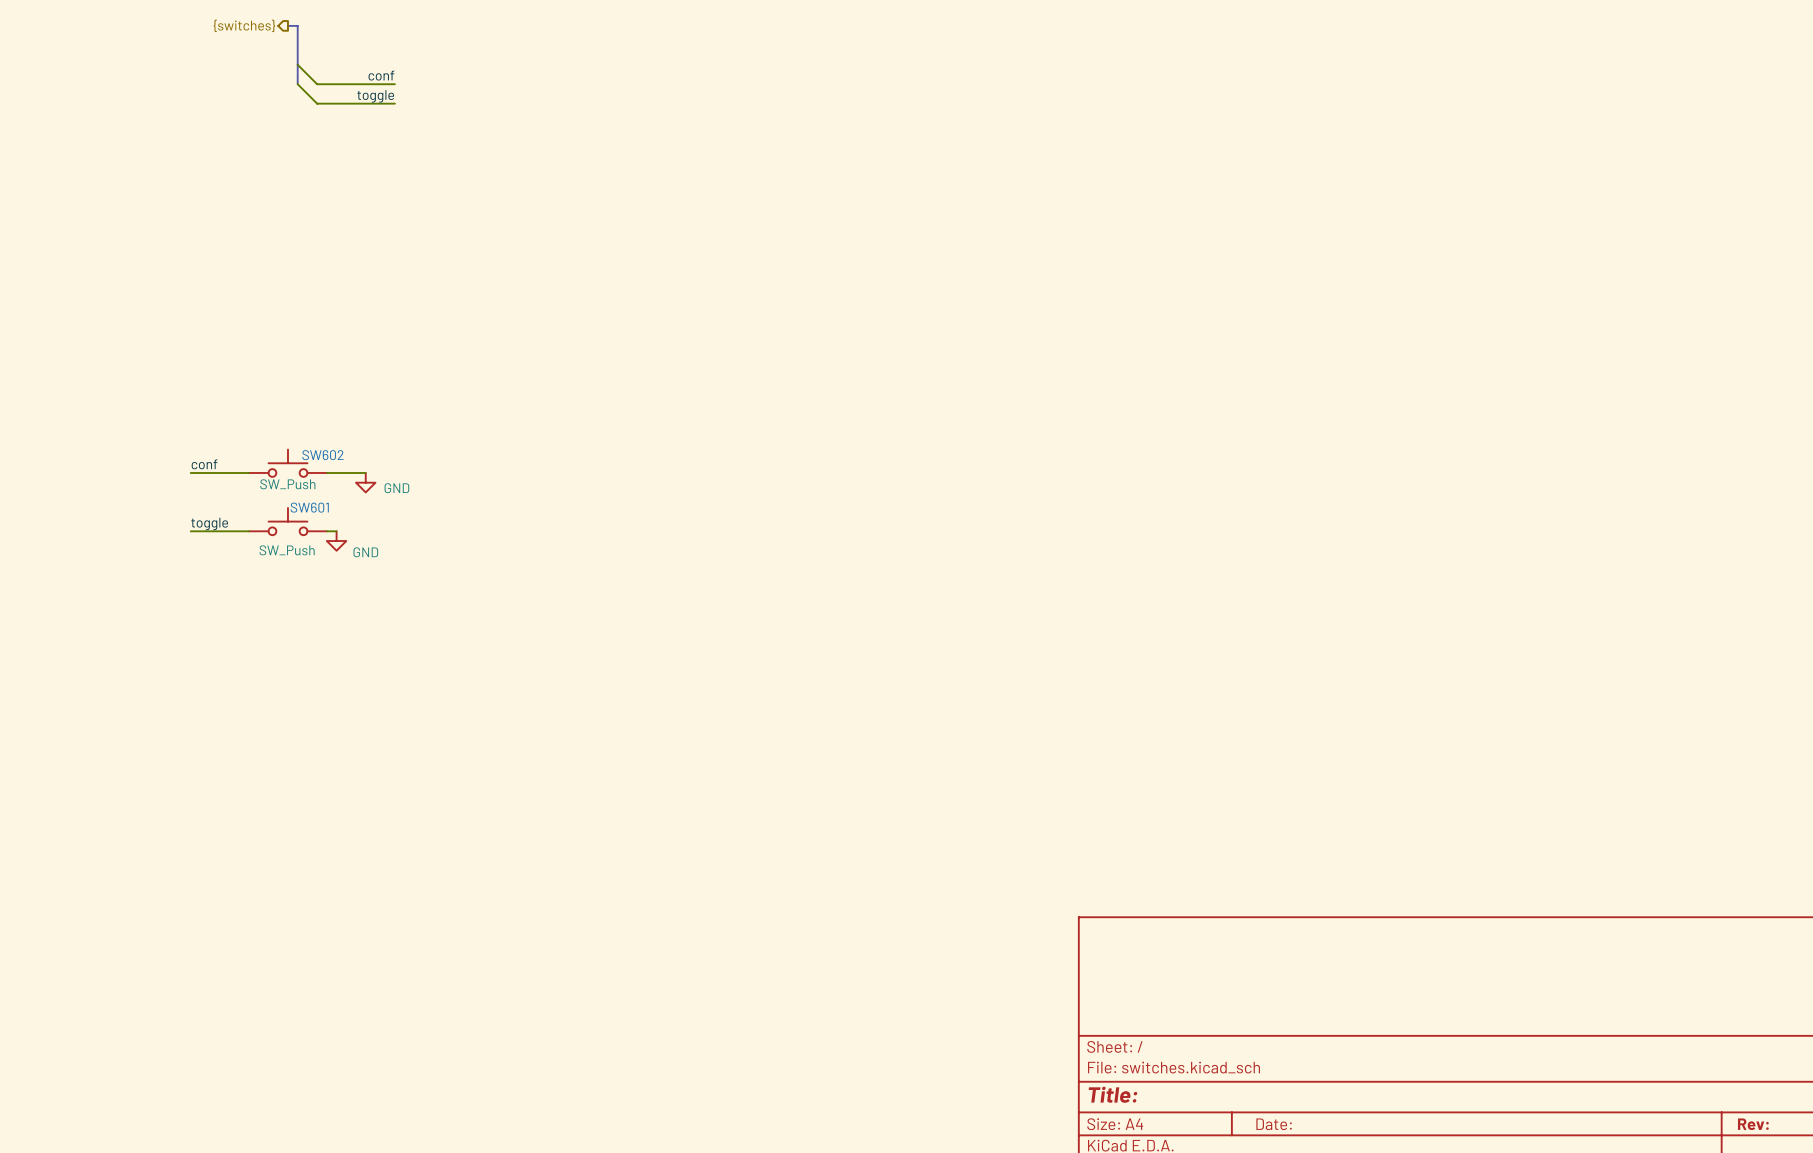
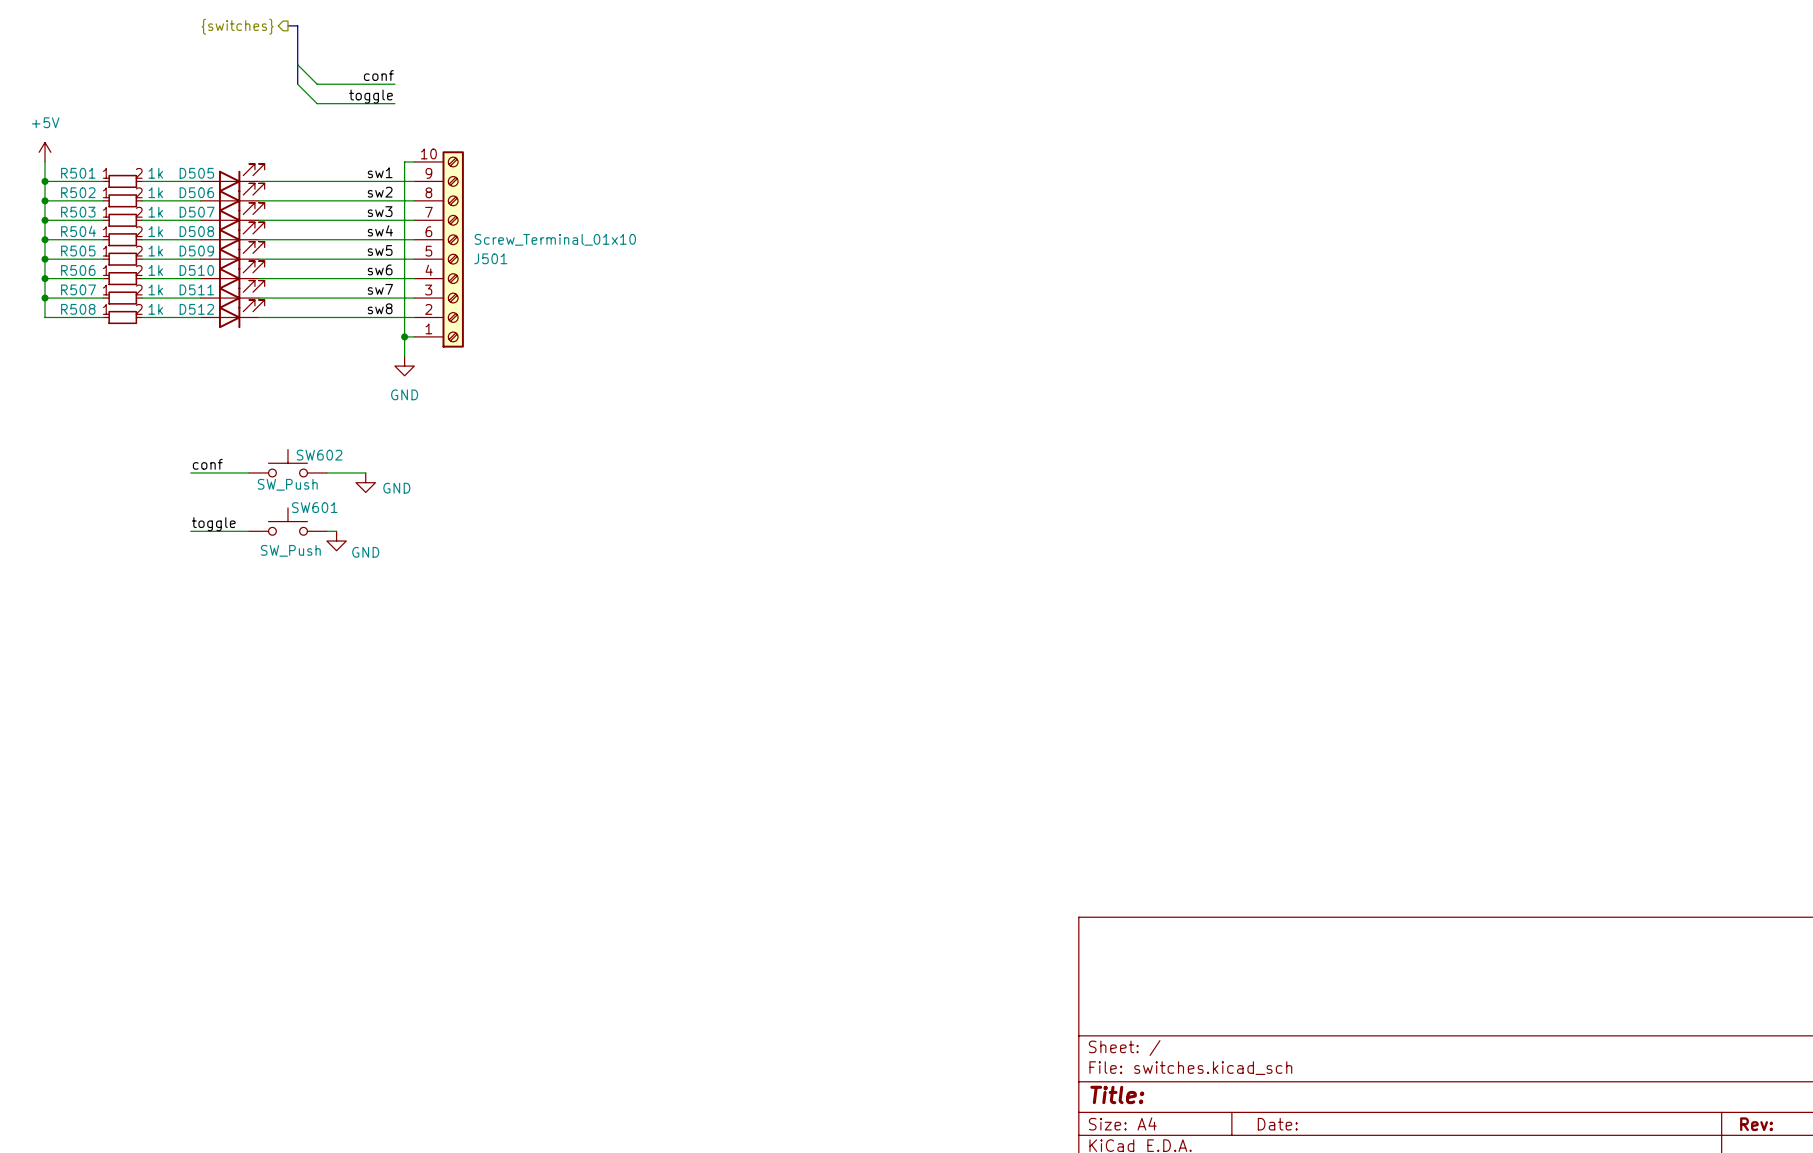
power symbol: none -> +5V (45, 152)
wire: none -> (45, 161) (45, 317) (103, 317)
wire: none -> (414, 161) (404, 161) (404, 356)
label: none -> sw1 (380, 172)
D505: none -> (232, 178)
wire: none -> (45, 181) (103, 181)
junction: none -> (45, 181)
R501: none -> 1k (122, 181)
wire: none -> (142, 181) (200, 181)
wire: none -> (258, 181) (414, 181)
label: none -> sw2 (380, 192)
D506: none -> (232, 197)
wire: none -> (45, 200) (103, 200)
junction: none -> (45, 200)
R502: none -> 1k (122, 200)
wire: none -> (142, 200) (200, 200)
wire: none -> (258, 200) (414, 200)
label: none -> sw3 (380, 211)
D507: none -> (232, 216)
wire: none -> (45, 220) (103, 220)
junction: none -> (45, 220)
R503: none -> 1k (122, 220)
wire: none -> (142, 220) (200, 220)
wire: none -> (258, 220) (414, 220)
label: none -> sw4 (380, 230)
D508: none -> (232, 236)
wire: none -> (45, 239) (103, 239)
junction: none -> (45, 239)
R504: none -> 1k (122, 239)
wire: none -> (142, 239) (200, 239)
wire: none -> (258, 239) (414, 239)
J501: none -> Screw_Terminal_01x10 (439, 249)
label: none -> sw5 (380, 250)
D509: none -> (232, 255)
wire: none -> (45, 259) (103, 259)
junction: none -> (45, 259)
R505: none -> 1k (122, 259)
wire: none -> (142, 259) (200, 259)
wire: none -> (258, 259) (414, 259)
label: none -> sw6 (380, 269)
D510: none -> (232, 275)
wire: none -> (45, 278) (103, 278)
junction: none -> (45, 278)
R506: none -> 1k (122, 278)
wire: none -> (142, 278) (200, 278)
wire: none -> (258, 278) (414, 278)
label: none -> sw7 (380, 289)
D511: none -> (232, 294)
wire: none -> (45, 298) (103, 298)
junction: none -> (45, 298)
R507: none -> 1k (122, 298)
wire: none -> (142, 298) (200, 298)
wire: none -> (258, 298) (414, 298)
label: none -> sw8 (380, 308)
D512: none -> (232, 314)
R508: none -> 1k (122, 317)
wire: none -> (142, 317) (200, 317)
wire: none -> (258, 317) (414, 317)
wire: none -> (404, 336) (414, 336)
junction: none -> (404, 336)
power symbol: none -> GND (404, 366)

